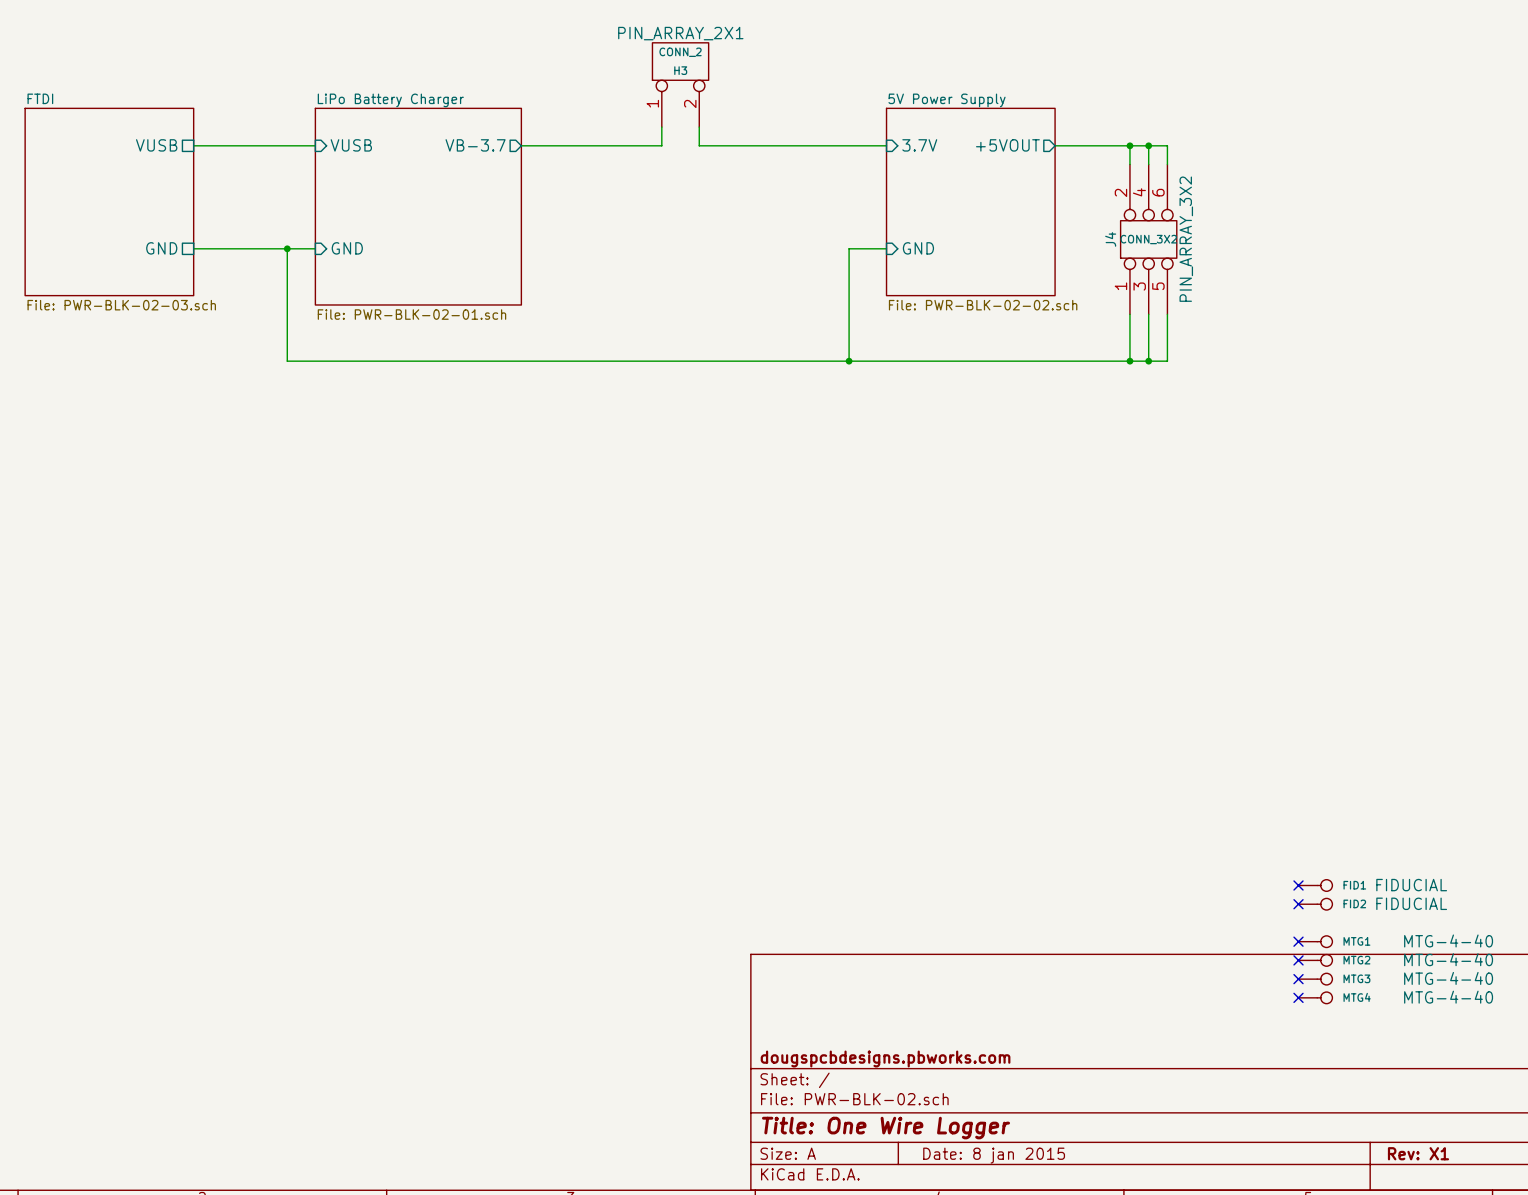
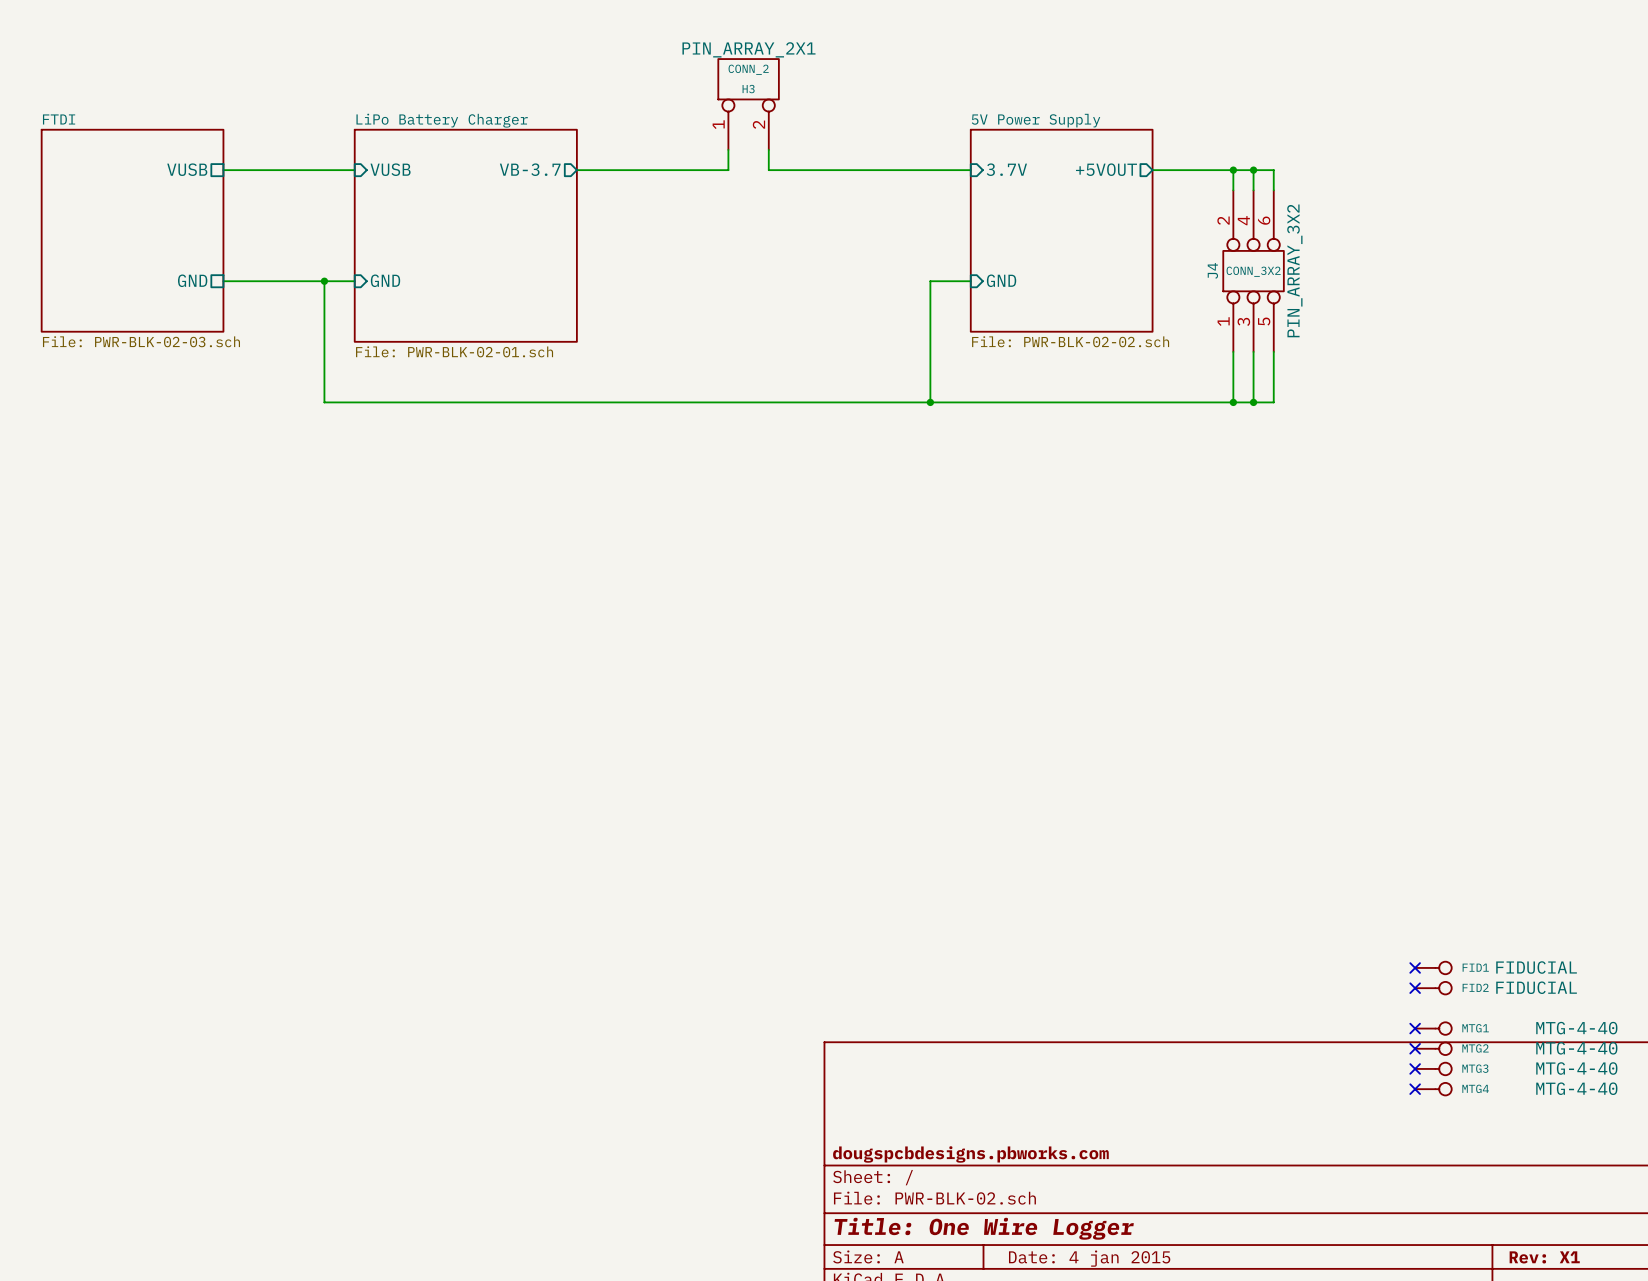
title block: Date: 8 jan 2015 (994, 1155) -> Date: 4 jan 2015 (1089, 1258)

